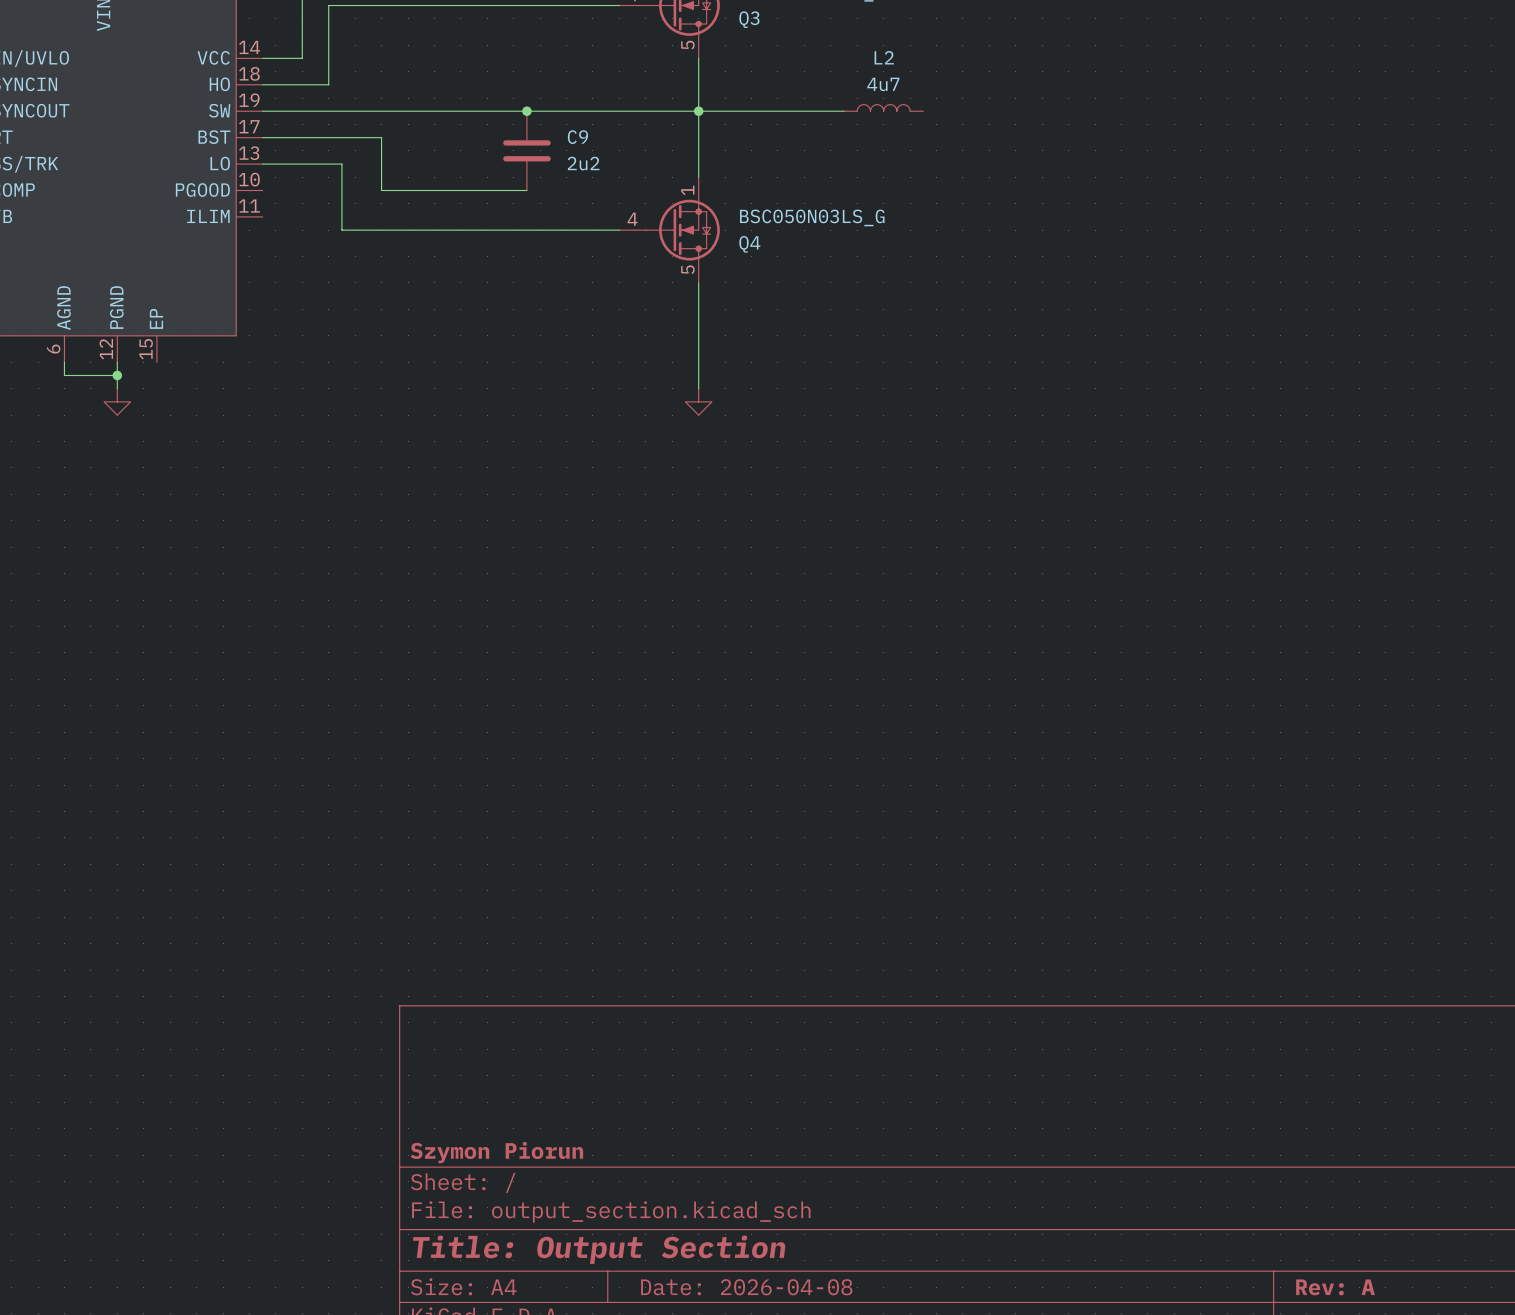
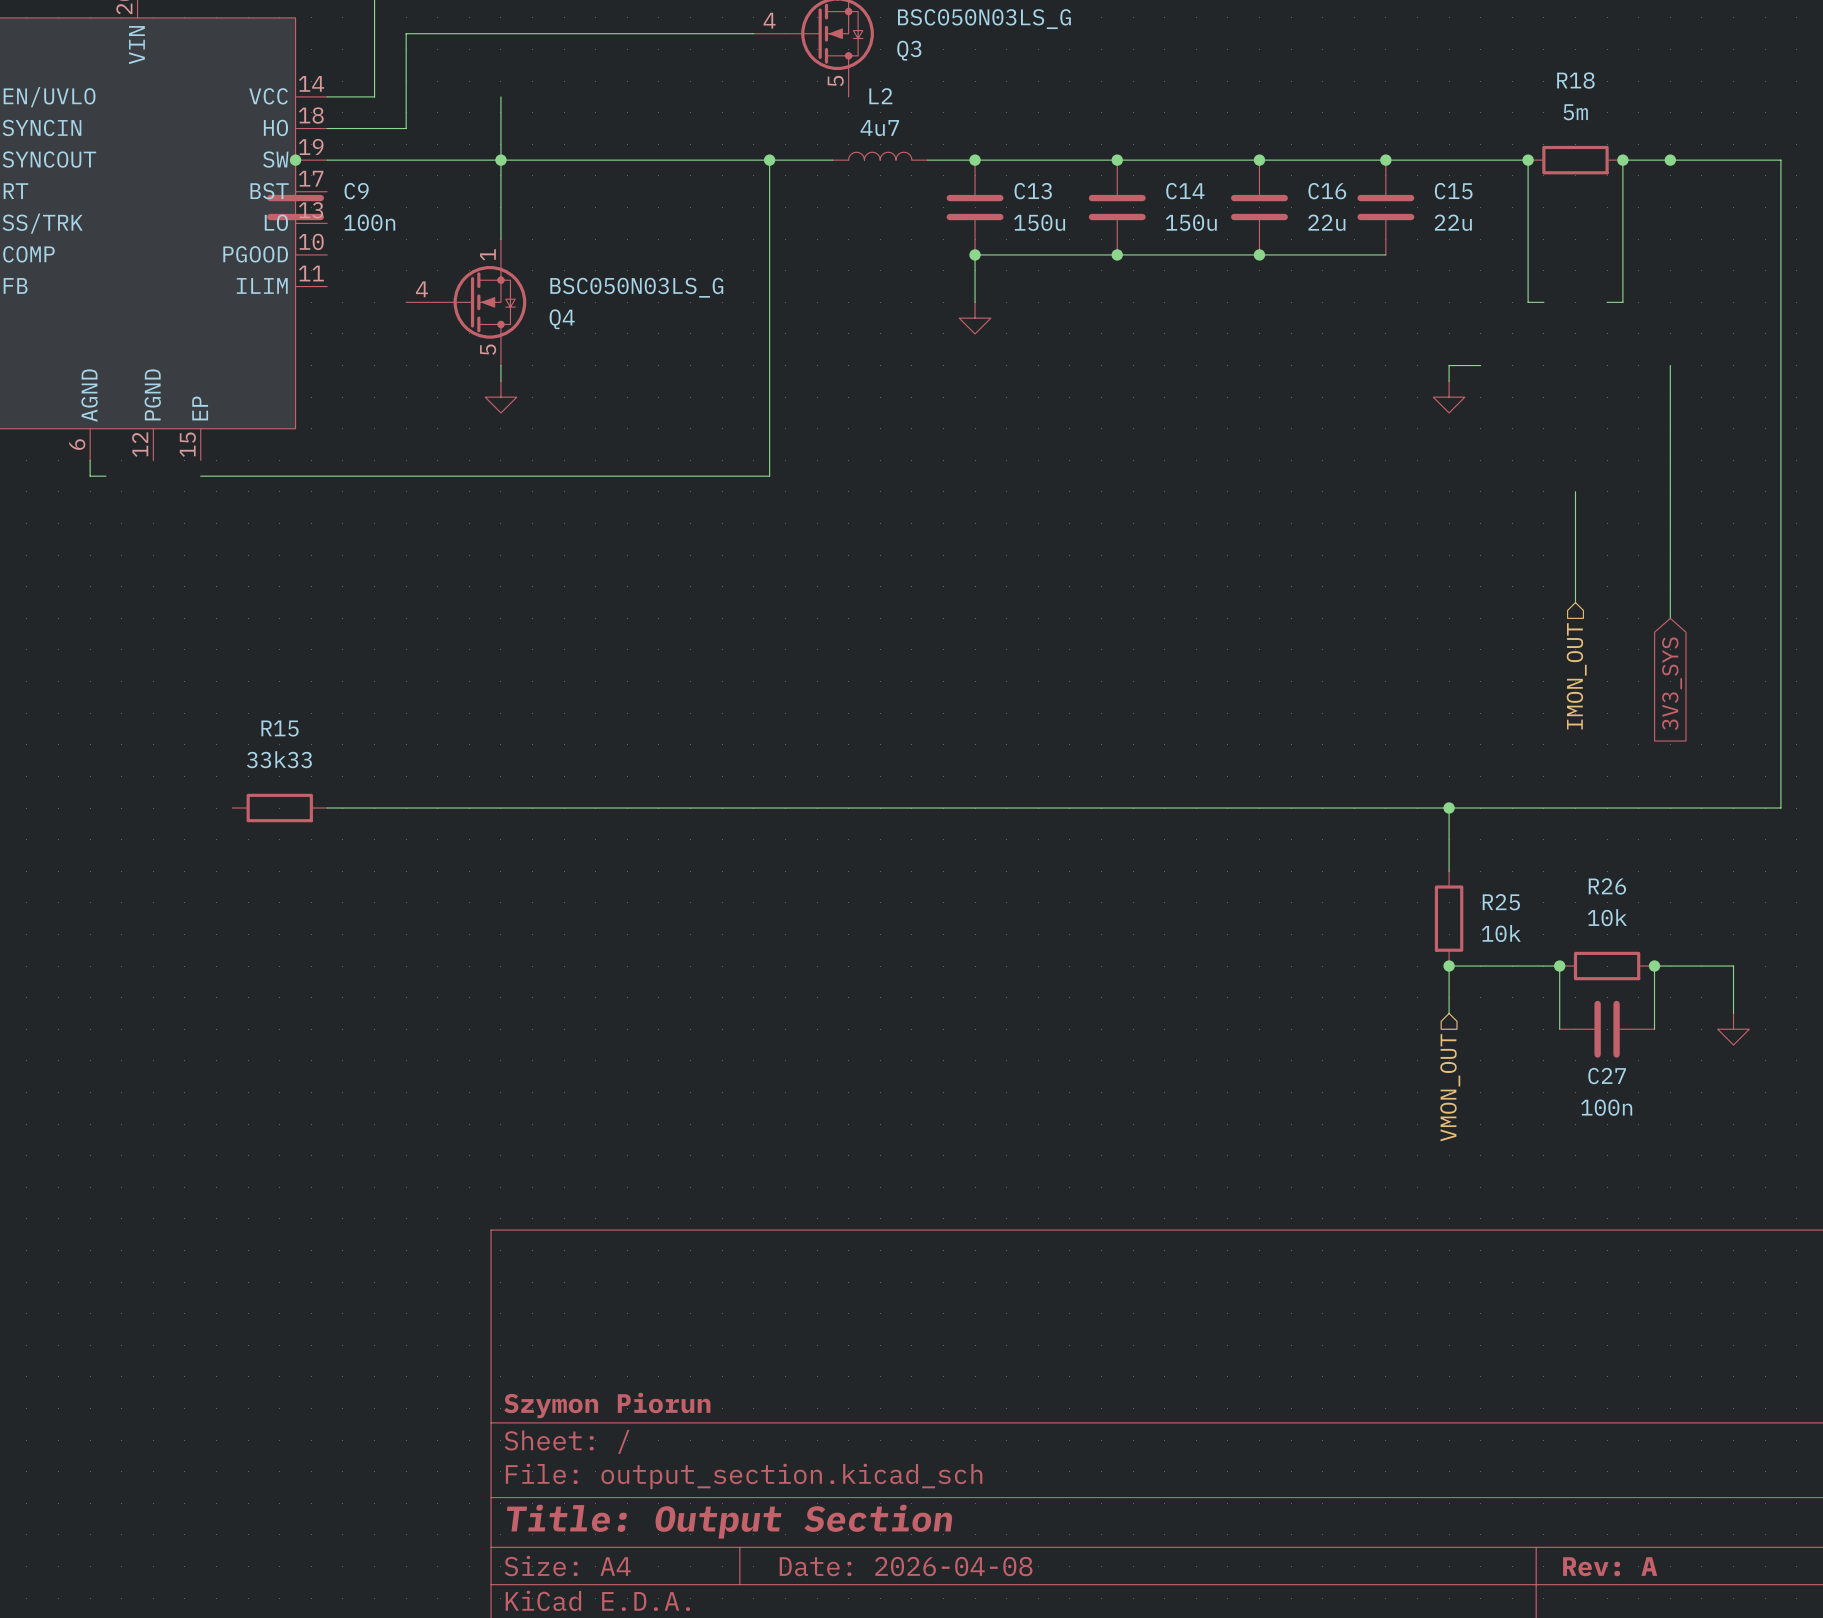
wire: none -> (500, 96) (500, 239)
wire: (698, 58) (698, 177) -> none
L2 position: (883, 107) -> (880, 156)
junction: none -> (295, 160)
junction: none -> (500, 160)
junction: (526, 111) -> none
wire: none -> (769, 160) (769, 476) (200, 476)
junction: none -> (769, 160)
wire: (685, 111) (764, 111) -> none
junction: (698, 111) -> none
junction: none -> (975, 160)
wire: none -> (1022, 160) (1528, 160) (1528, 302) (1543, 302)
junction: none -> (1117, 160)
junction: none -> (1259, 160)
junction: none -> (1385, 160)
junction: none -> (1528, 160)
R18: none -> 5m (1575, 160)
junction: none -> (1622, 160)
junction: none -> (1670, 160)
wire: (262, 137) (381, 137) (381, 190) (526, 190) -> none
C9 position: (526, 150) -> (295, 207)
C13: none -> 150u (975, 207)
C14: none -> 150u (1117, 207)
C16: none -> 22u (1259, 207)
C15: none -> 22u (1385, 207)
C9 value: 2u2 (583, 163) -> 100n (369, 222)
wire: (262, 164) (341, 164) (341, 230) (619, 230) -> none
junction: none -> (975, 254)
junction: none -> (1117, 254)
junction: none -> (1259, 254)
wire: none -> (1385, 254) (975, 254) (975, 302)
Q4 position: (669, 230) -> (466, 302)
wire: none -> (1607, 302) (1622, 302) (1622, 160) (1780, 160) (1780, 808) (327, 808)
power symbol: none -> (975, 318)
wire: none -> (500, 365) (500, 381)
wire: (698, 282) (698, 388) -> none
wire: none -> (1480, 365) (1449, 365) (1449, 381)
wire: none -> (1670, 365) (1670, 618)
power symbol: none -> (500, 397)
power symbol: none -> (1449, 397)
wire: (117, 362) (117, 388) -> none
wire: (77, 375) (117, 375) -> none
junction: (117, 375) -> none
wire: none -> (1575, 491) (1575, 602)
power symbol: (117, 401) -> none
power symbol: (698, 401) -> none
hierarchical label: none -> IMON_OUT (1576, 676)
global label: none -> 3V3_SYS (1672, 683)
R15: none -> 33k33 (279, 808)
wire: none -> (1449, 808) (1449, 871)
junction: none -> (1449, 808)
R25: none -> 10k (1449, 918)
junction: none -> (1449, 966)
junction: none -> (1559, 966)
R26: none -> 10k (1607, 966)
junction: none -> (1654, 966)
wire: none -> (1449, 1013) (1449, 966) (1559, 966) (1559, 1029)
wire: none -> (1733, 1013) (1733, 966) (1654, 966) (1654, 1029)
C27: none -> 100n (1607, 1029)
power symbol: none -> (1733, 1029)
hierarchical label: none -> VMON_OUT (1450, 1087)

